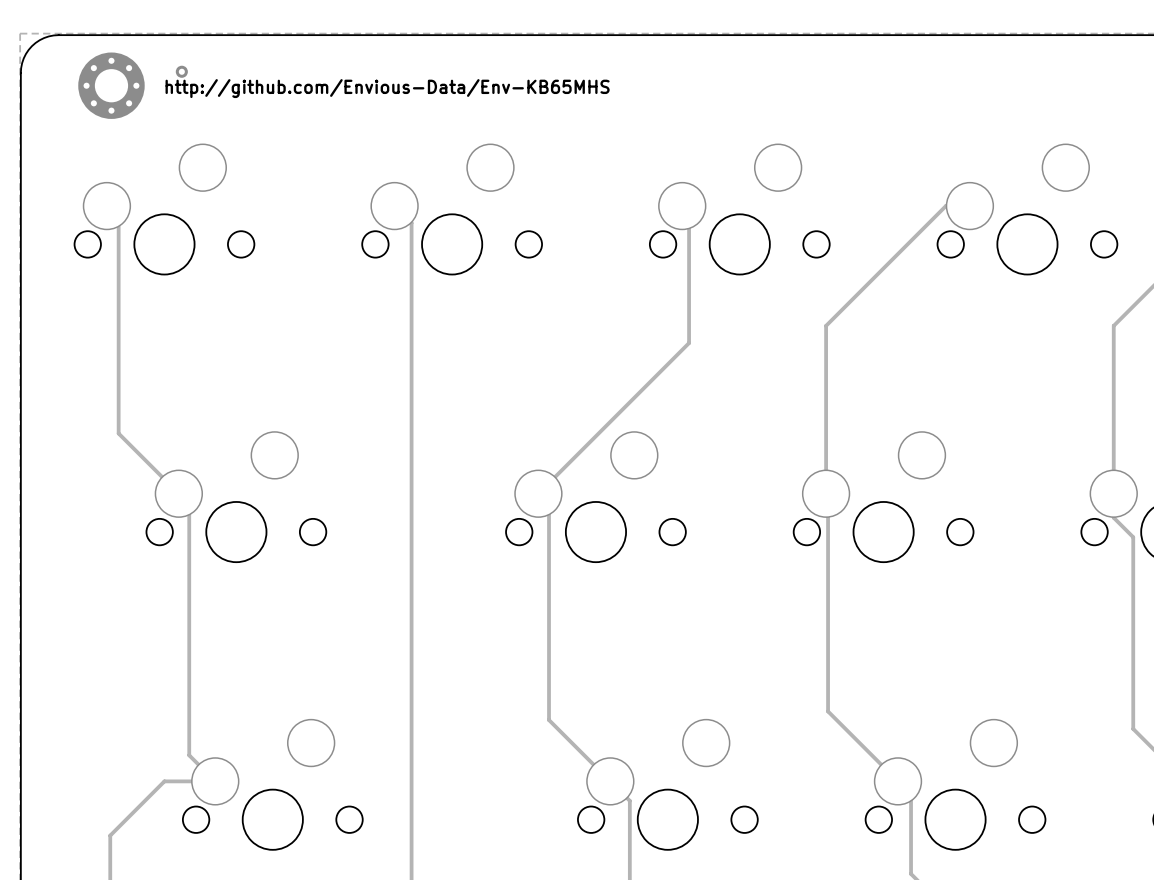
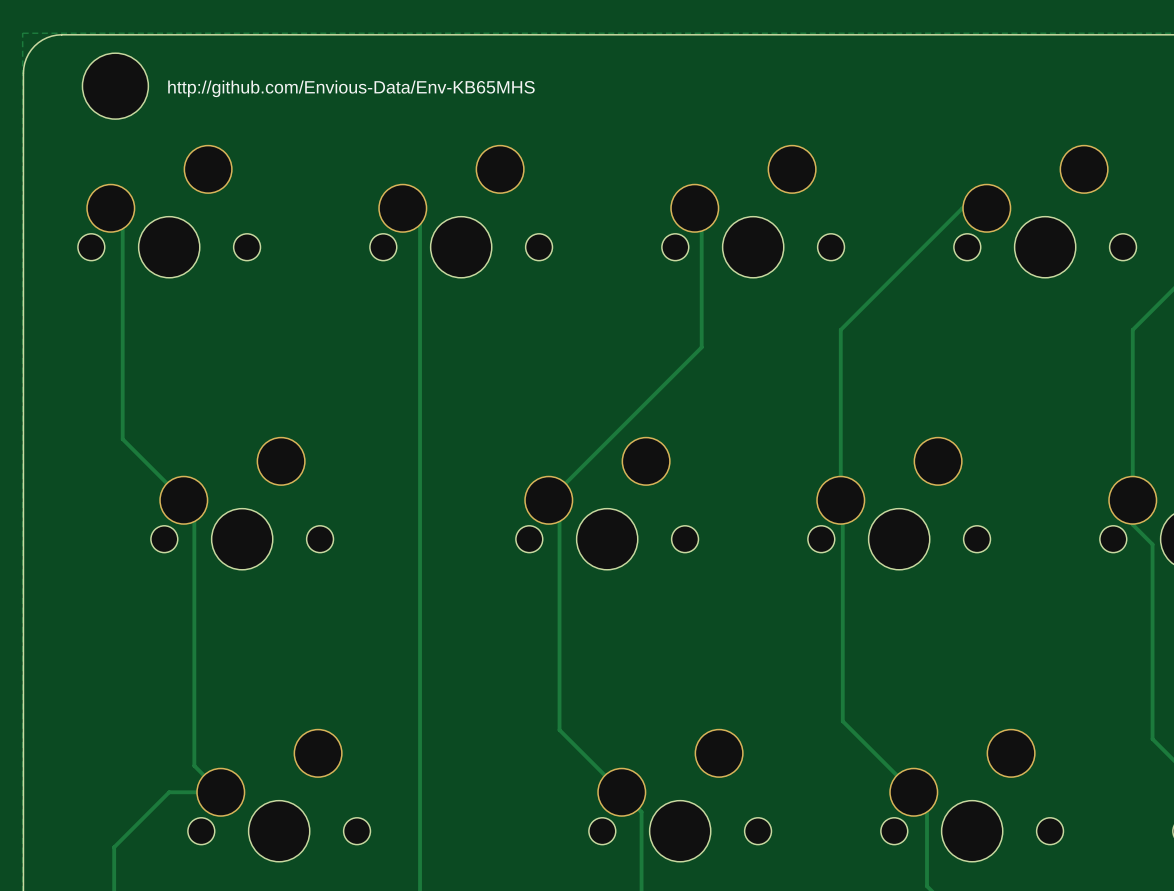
part footprint: [78, 52, 145, 119] -> [82, 53, 149, 120]
via: (181, 71) -> none

